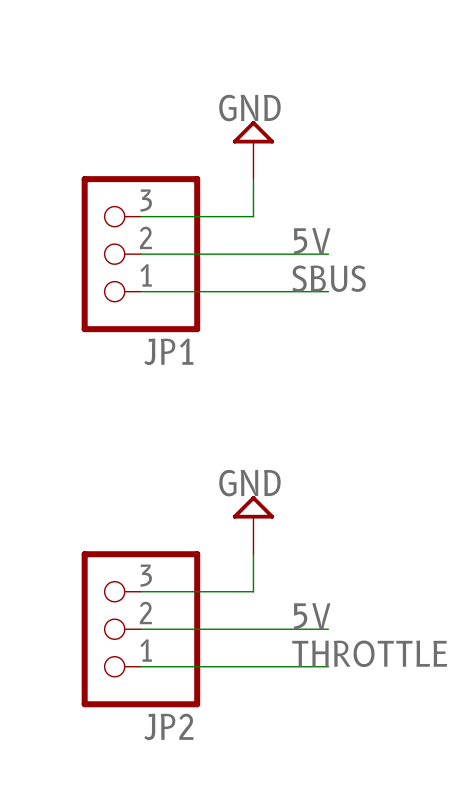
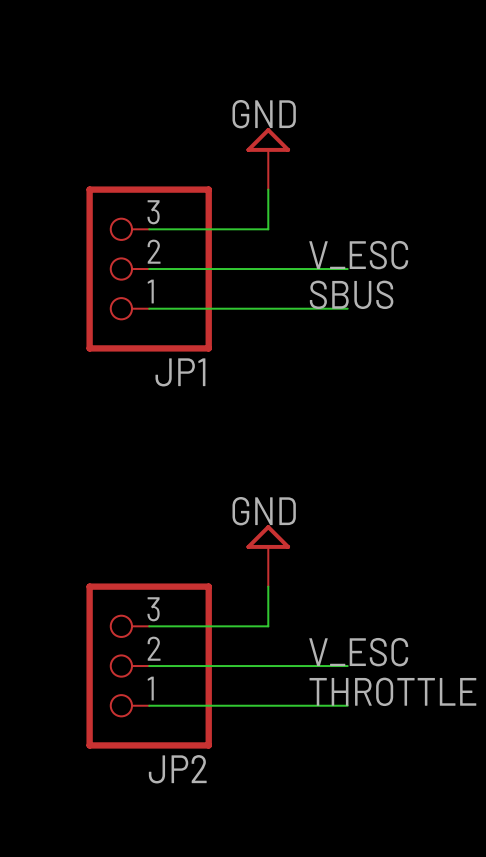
label: 5V (312, 241) -> V_ESC (358, 255)
label: 5V (312, 616) -> V_ESC (358, 652)

